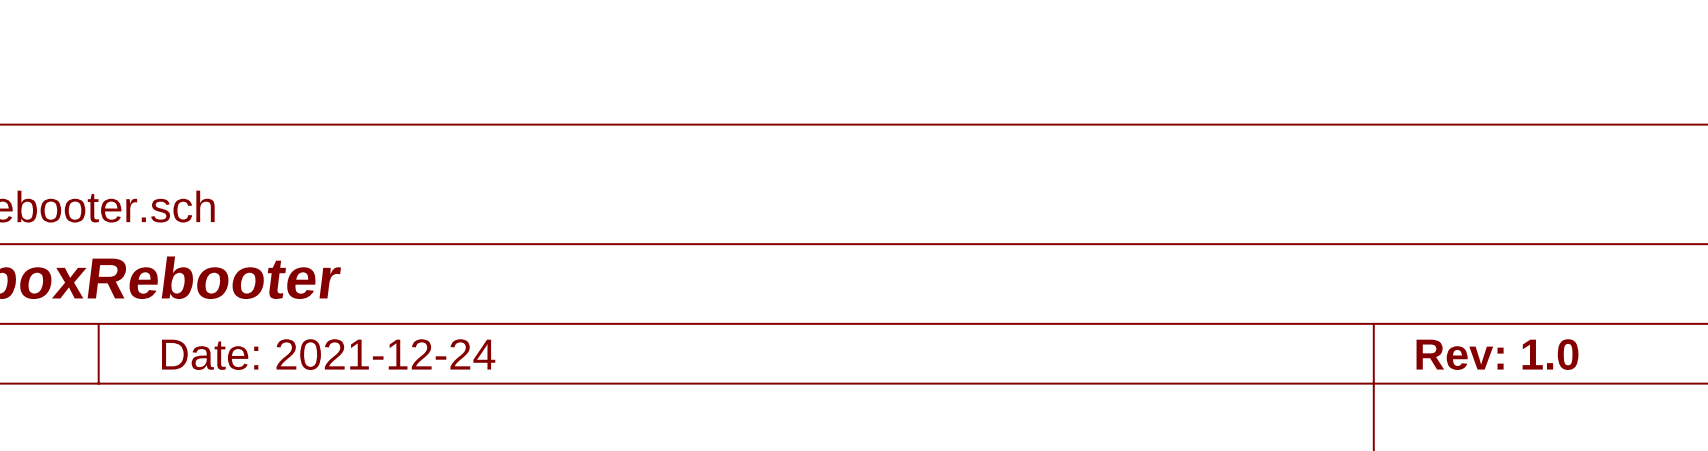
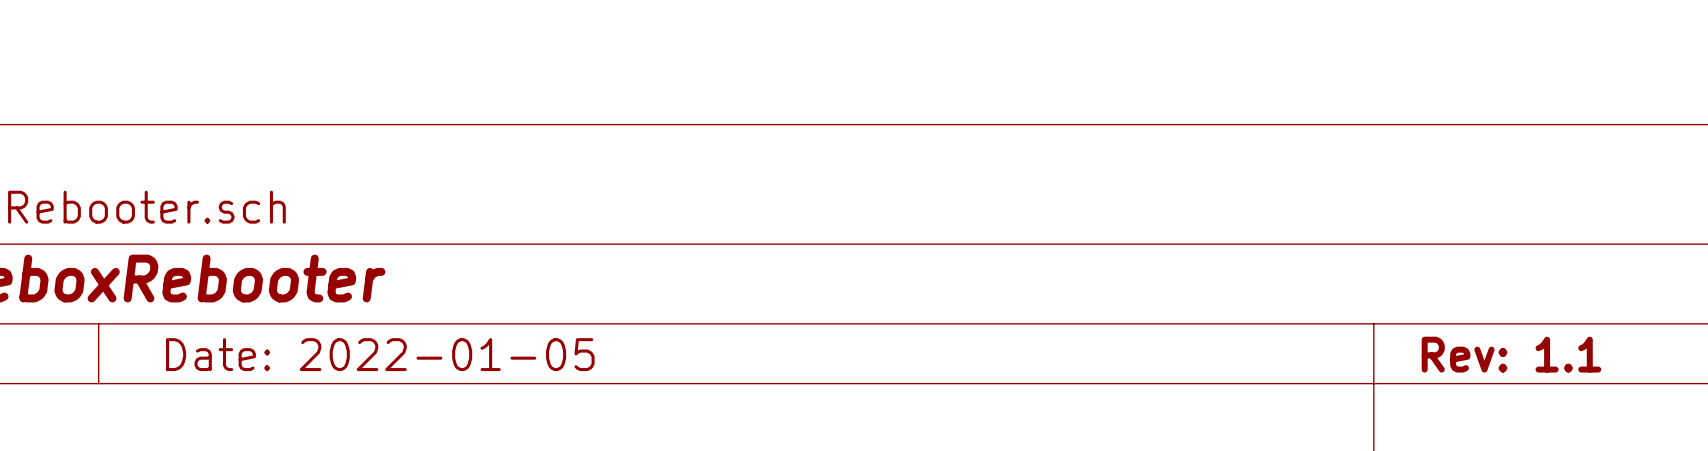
title block: Date: 2021-12-24 (328, 354) -> Date: 2022-01-05 (380, 354)
title block: Rev: 1.0 (1497, 354) -> Rev: 1.1 (1511, 354)

